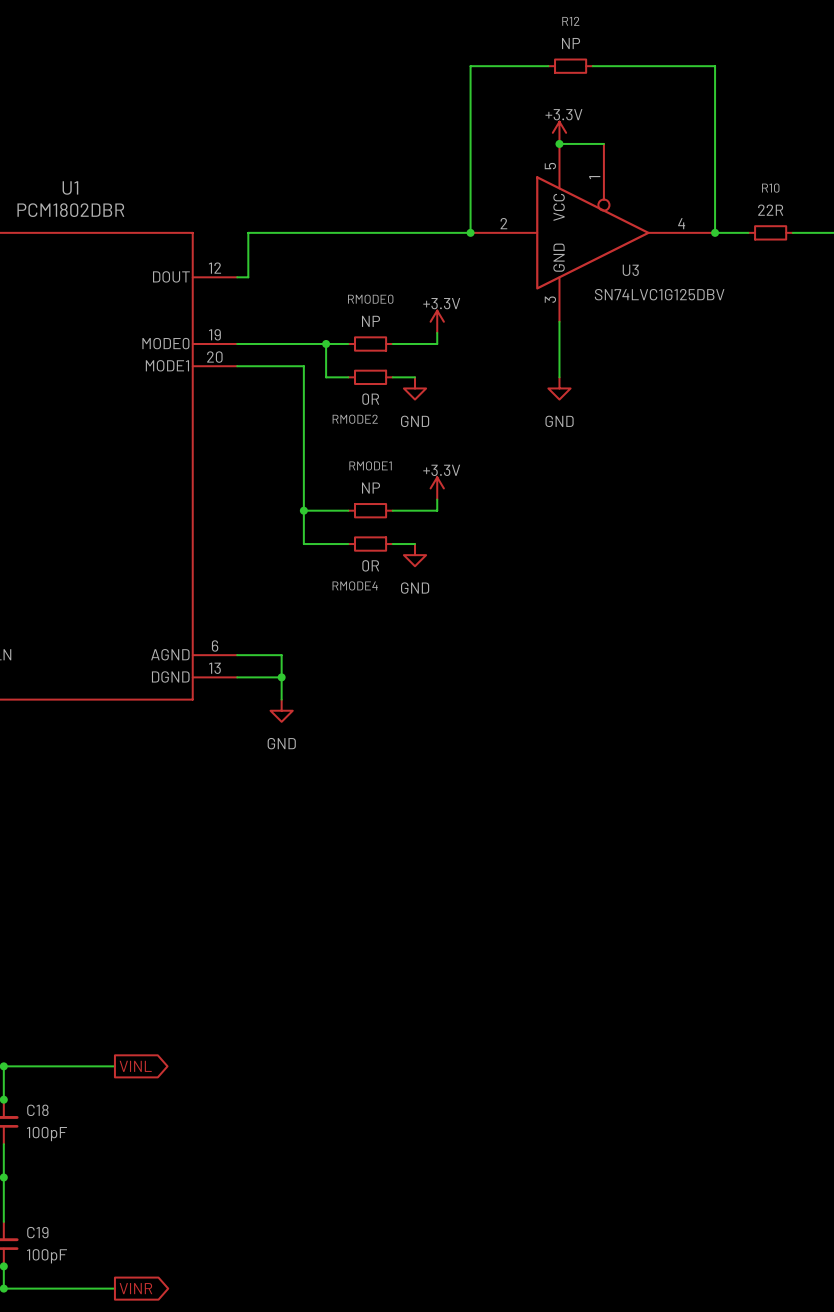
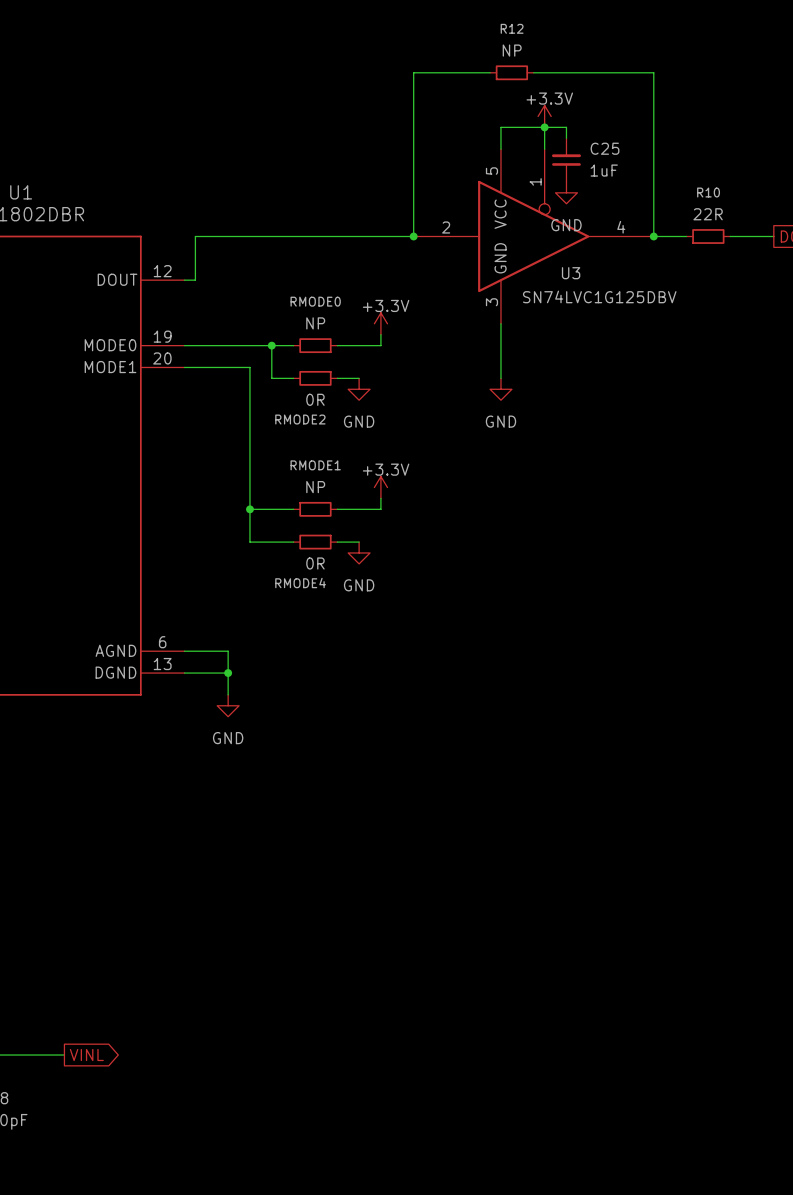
wire: none -> (544, 127) (544, 149)
power symbol position: +3.3V (559, 132) -> +3.3V (544, 116)
wire: (559, 143) (603, 143) -> (500, 149) (500, 127) (566, 127) (566, 138)
junction position: (559, 143) -> (544, 127)
C25: none -> 1uF (566, 160)
power symbol: none -> GND (566, 192)

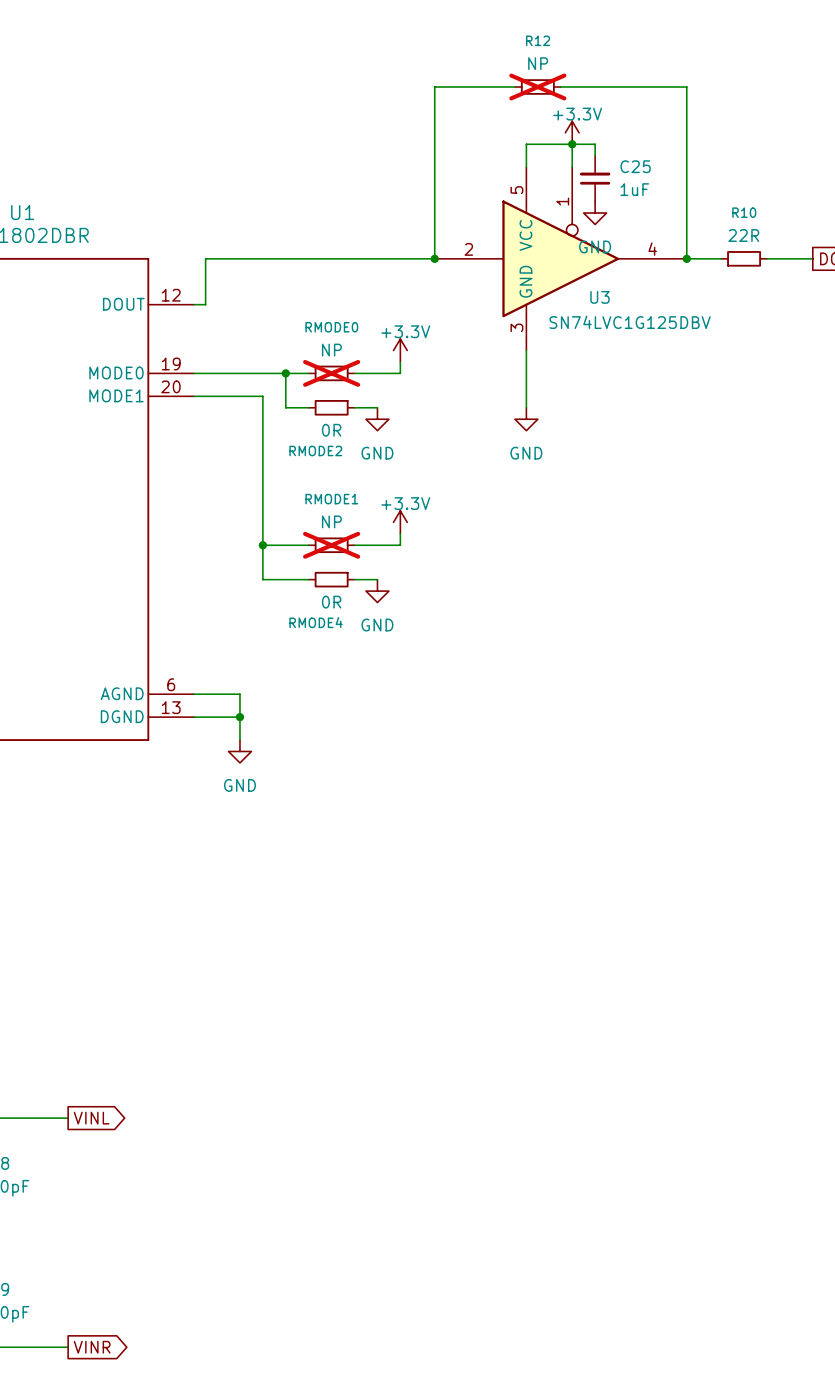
R12 do-not-place cross: none -> (537, 86)
RMODE0 do-not-place cross: none -> (331, 373)
RMODE1 do-not-place cross: none -> (331, 545)

